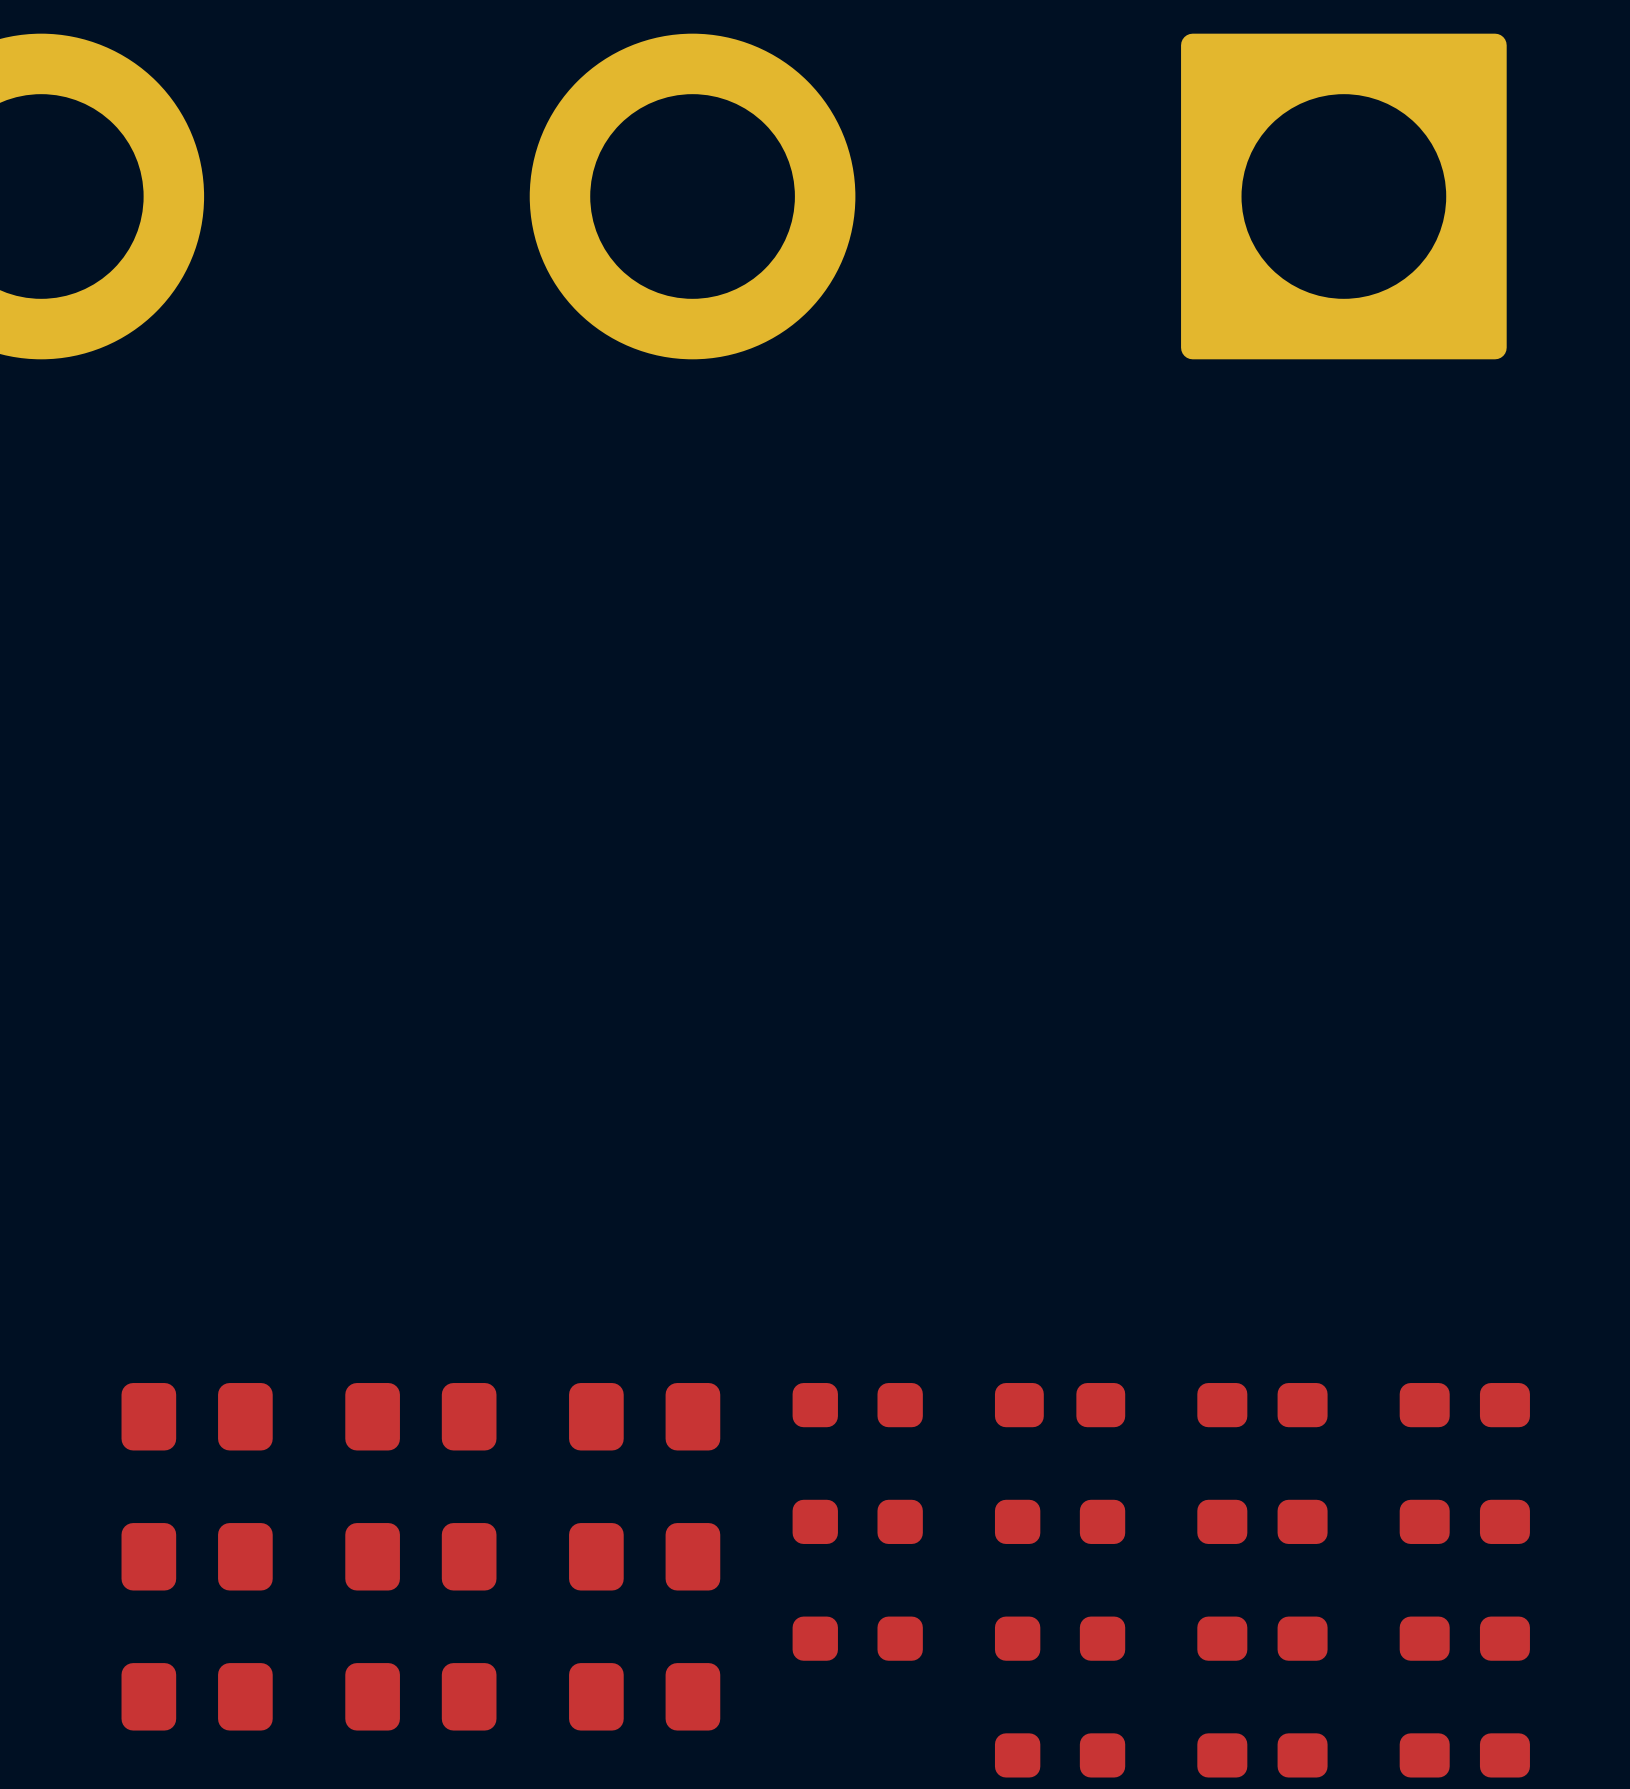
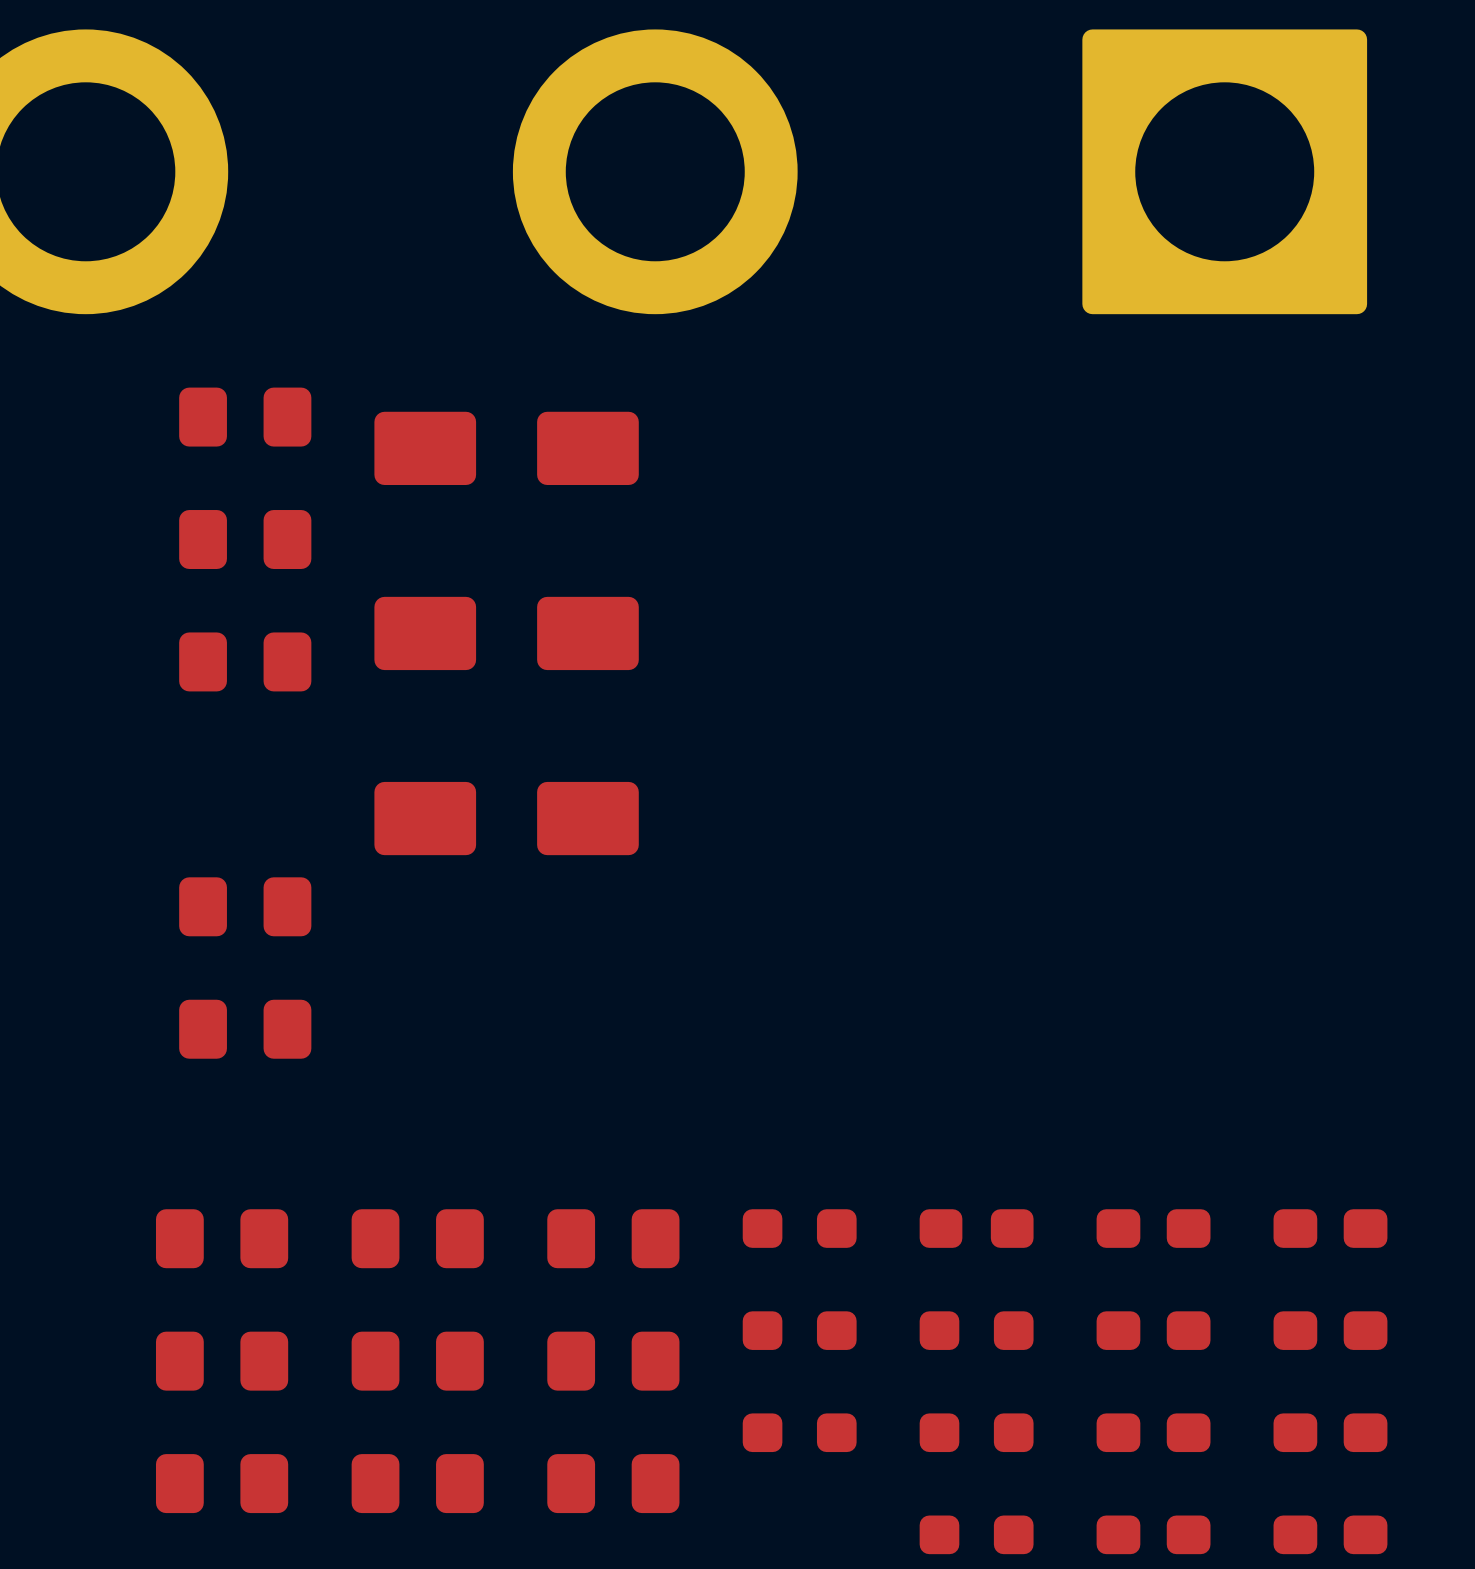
part: none -> (245, 417)
part: none -> (506, 448)
part: none -> (245, 539)
part: none -> (506, 633)
part: none -> (245, 661)
part: none -> (506, 818)
part: none -> (245, 906)
part: none -> (245, 1029)

